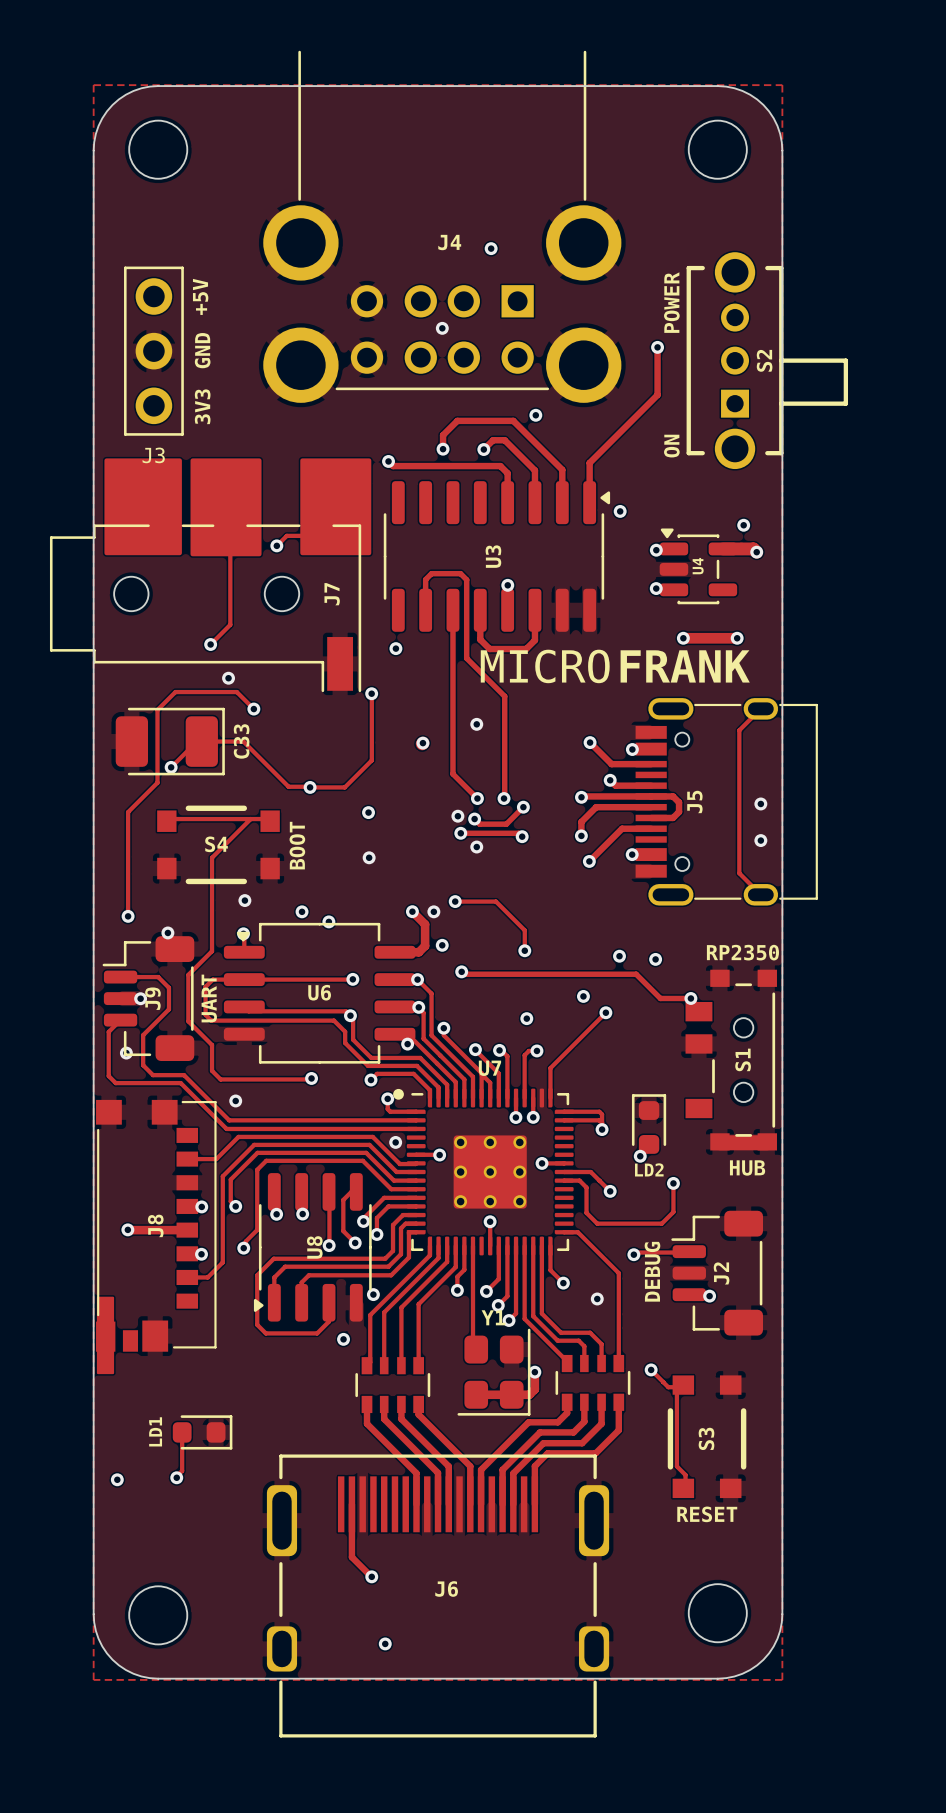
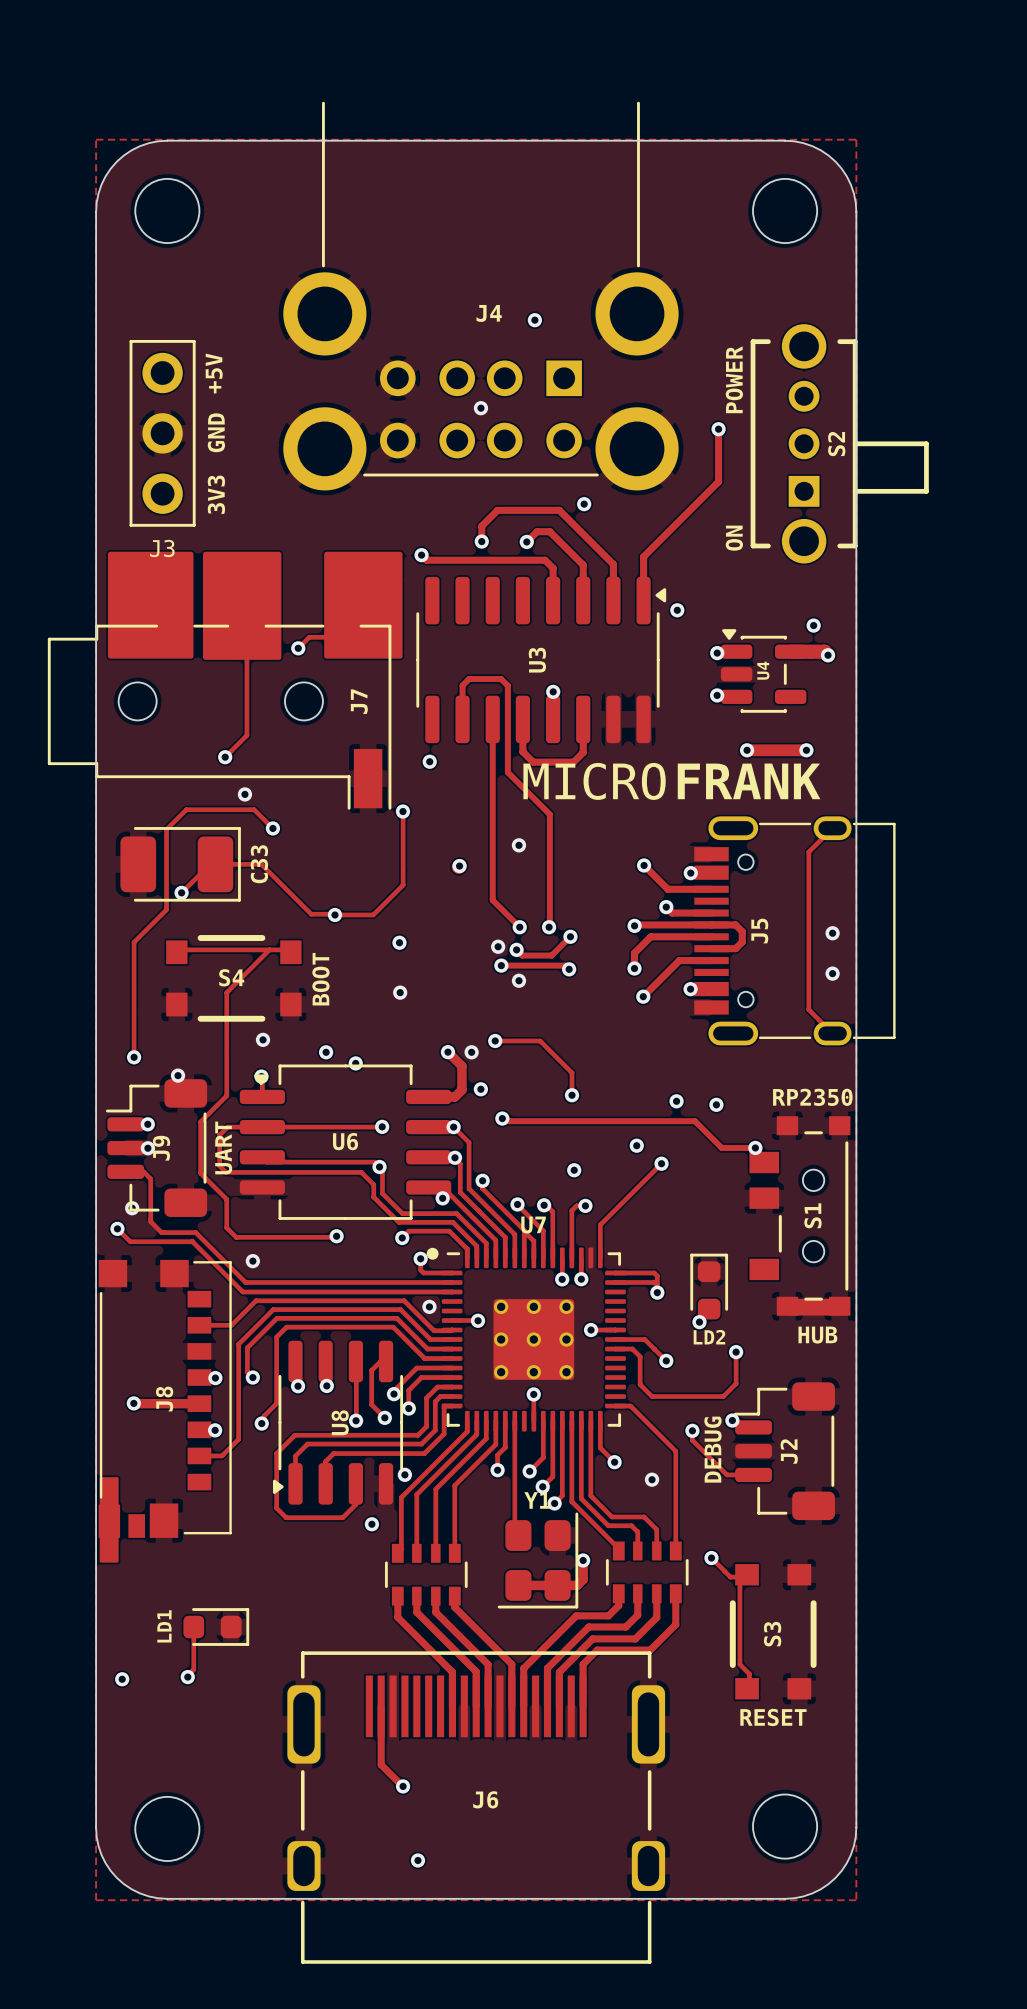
track: (120, 977) (158, 977) (168, 987) (168, 1009) (143, 1035) -> (125, 1171) (143, 1171) (150, 1178) (150, 1188)
via: none -> (147, 1124)
track: (120, 1020) (108, 1031) (108, 1076) (115, 1083) (180, 1083) -> (117, 1228) (130, 1241) (192, 1241)
via: none -> (117, 1228)
track: (688, 1252) (636, 1252) (633, 1254) -> (753, 1474) (727, 1474) (692, 1440) (692, 1430)
via position: (709, 1296) -> (732, 1420)

